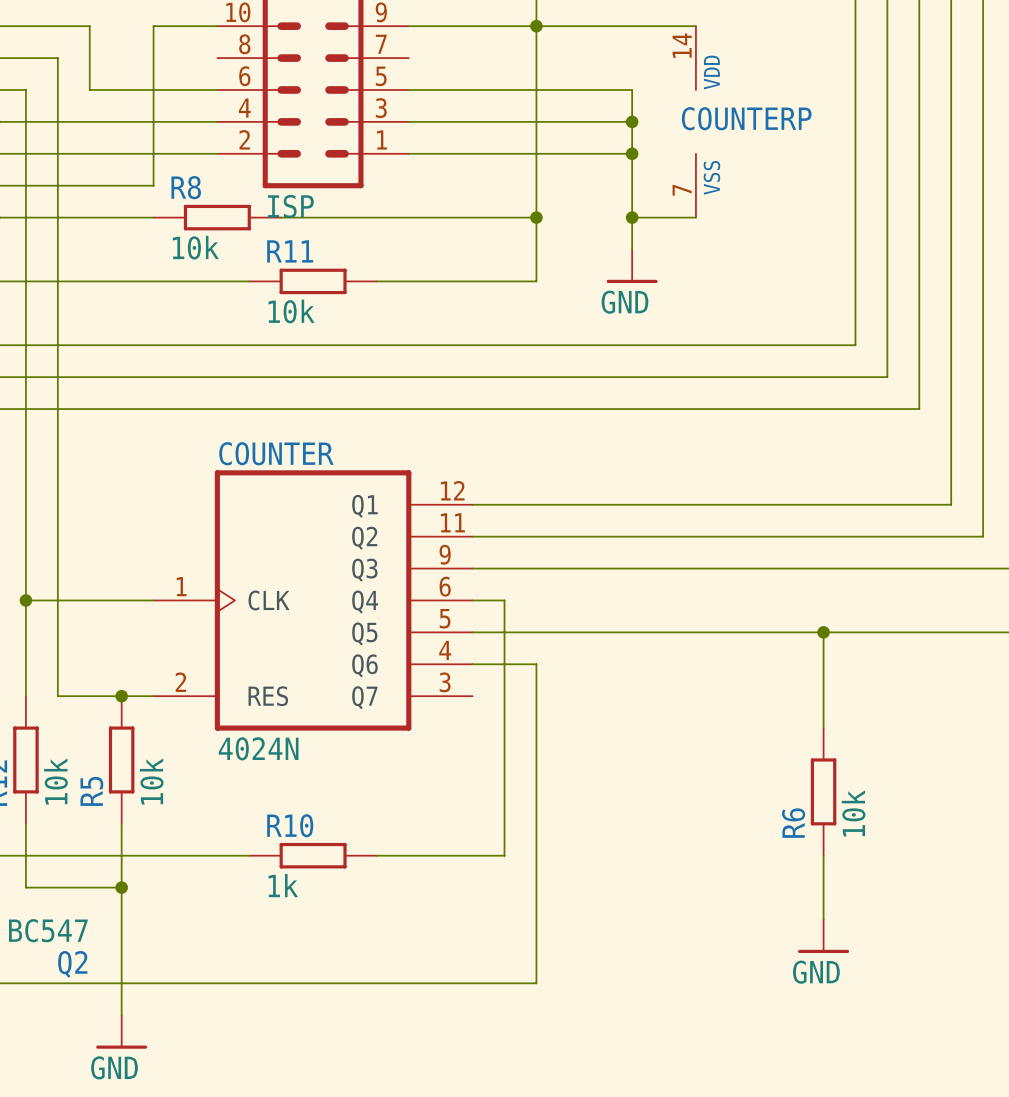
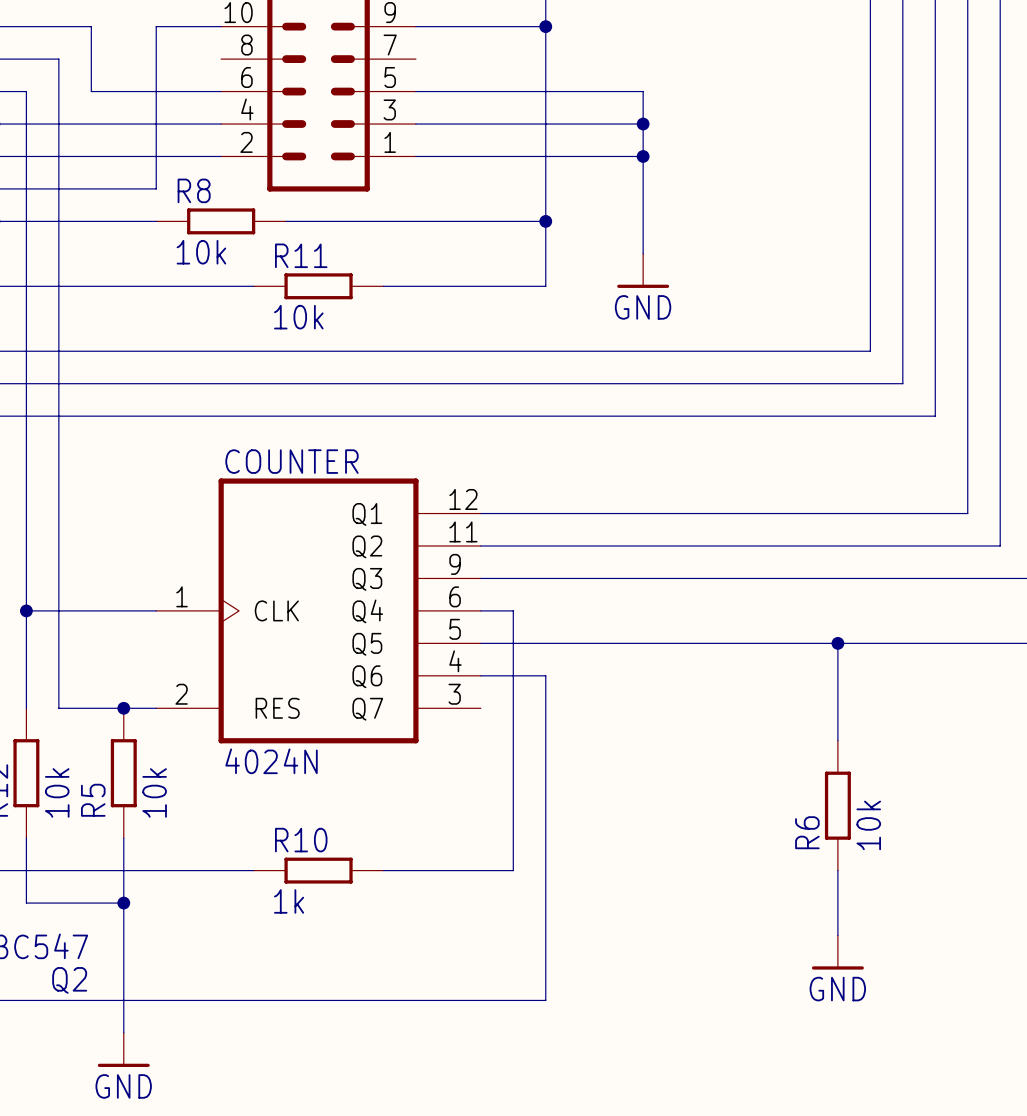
wire: (536, 26) (695, 26) -> none
COUNTERP: (695, 121) -> none
part value: ISP (290, 206) -> none
wire: (632, 217) (695, 217) -> none
junction: (632, 217) -> none

